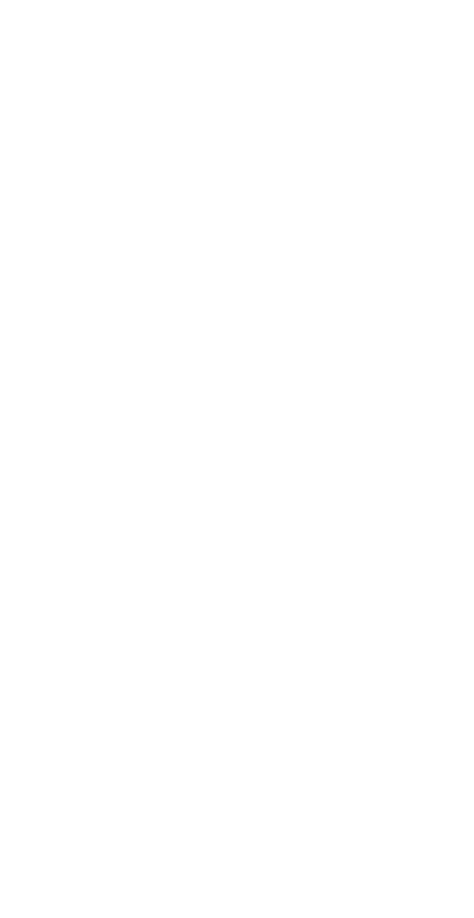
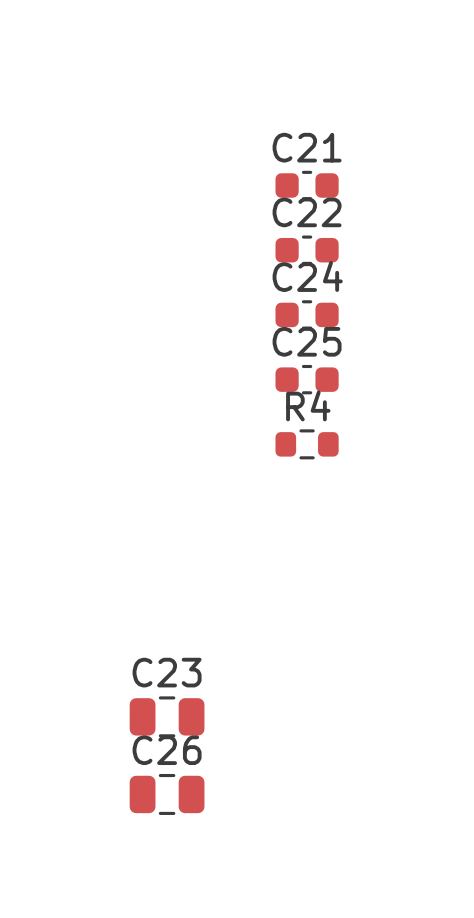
C21: none -> (307, 185)
C22: none -> (307, 250)
C24: none -> (307, 314)
C25: none -> (307, 379)
R4: none -> (307, 444)
C23: none -> (167, 716)
C26: none -> (167, 794)

